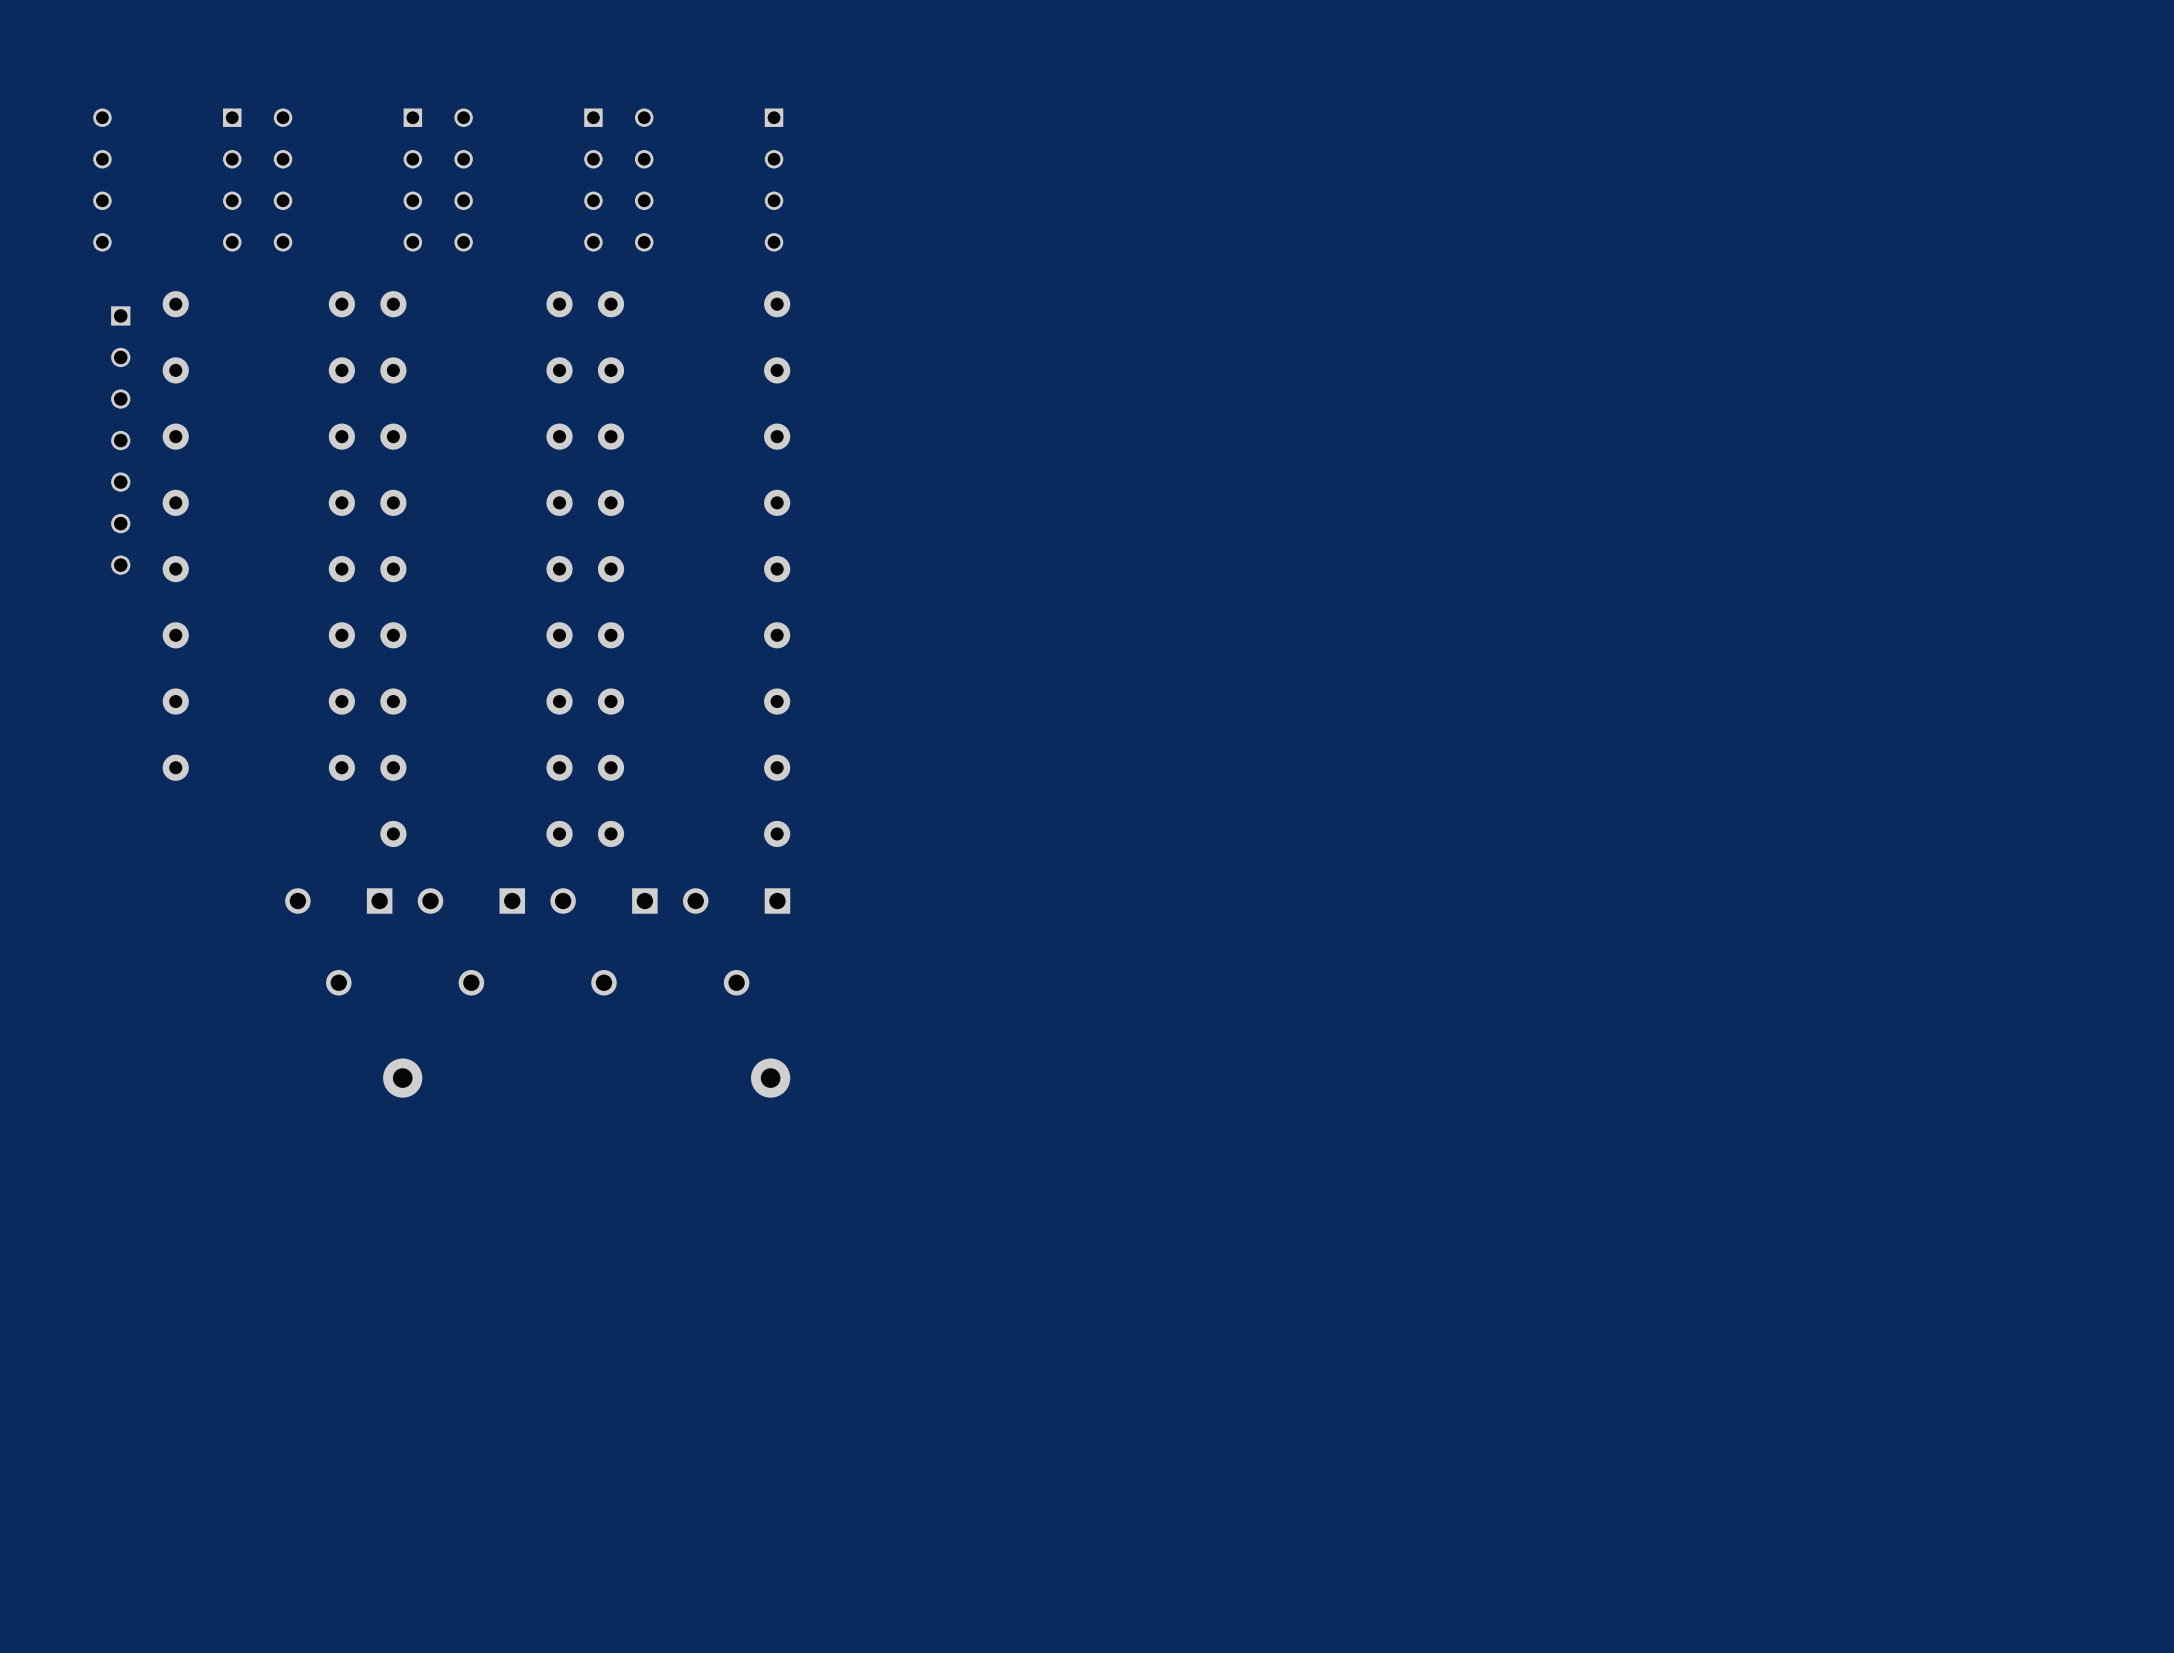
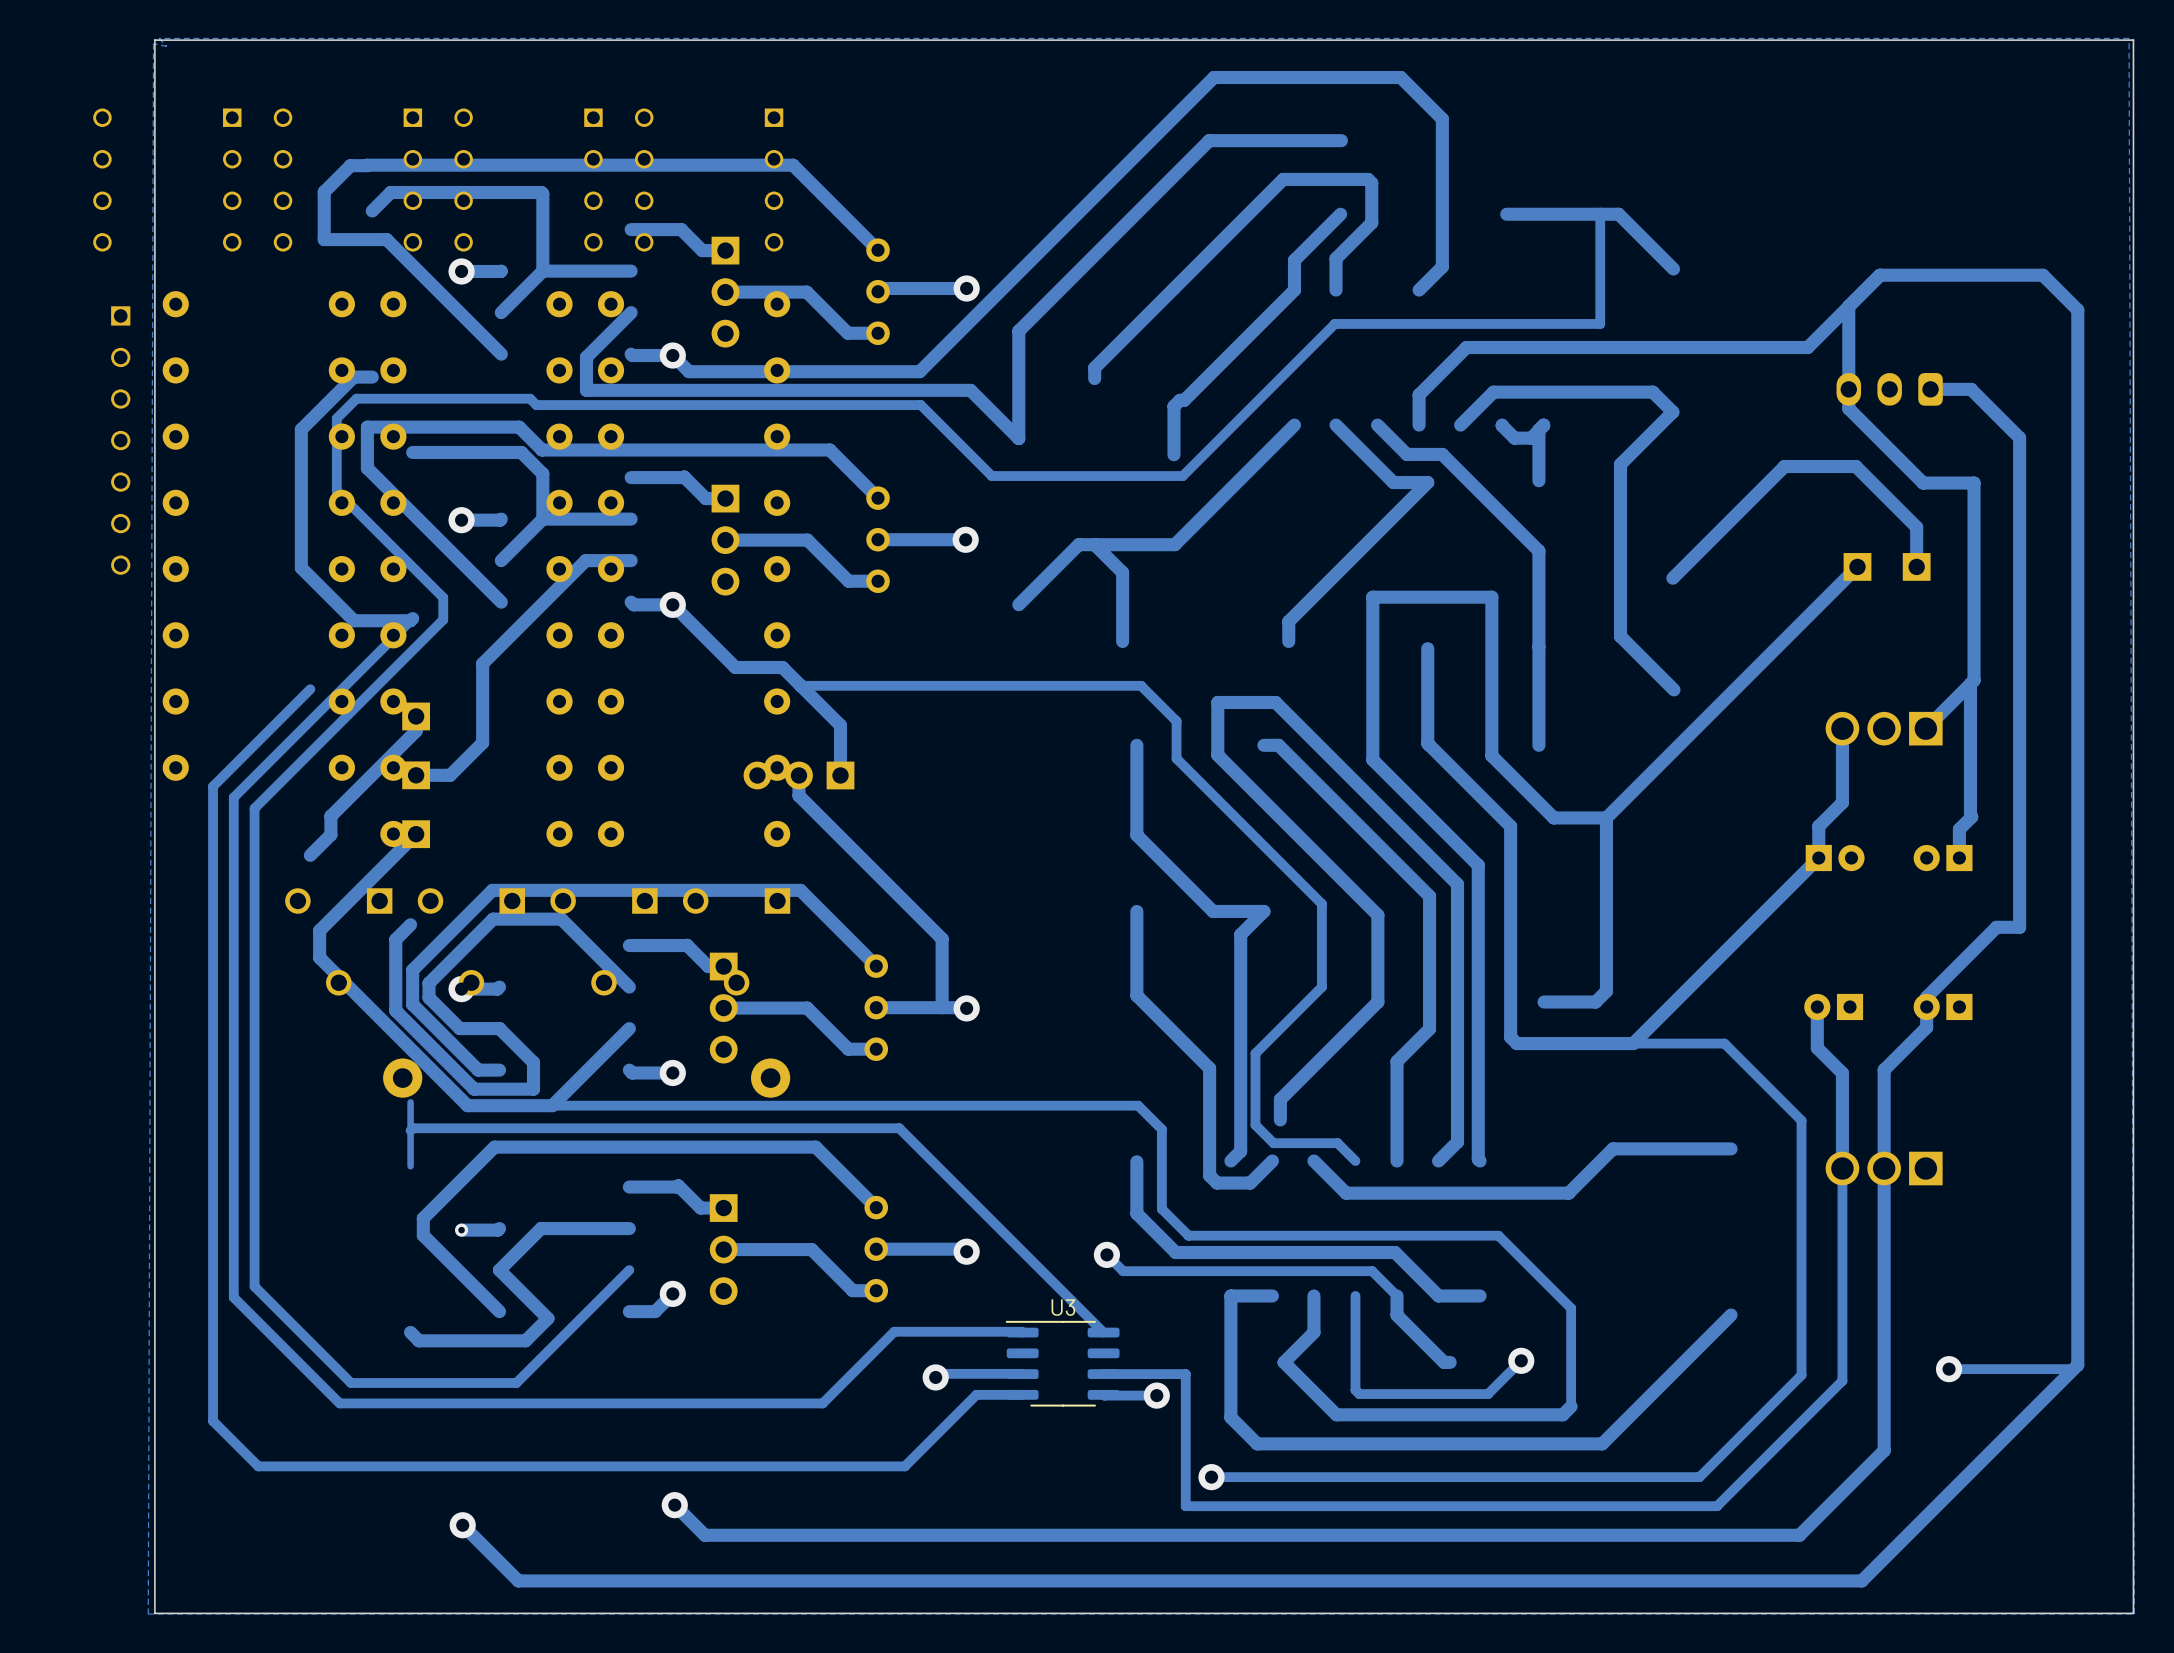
zone outline: none -> (2129, 38) (2134, 1614) (148, 1614) (153, 43) (166, 46) (158, 38) (2129, 38)
board edge: none -> (2133, 40) (154, 40) (154, 1613) (2133, 1613) (2133, 40)
track: none -> (1341, 140) (1209, 140) (1018, 331) (1018, 438) (970, 390) (586, 390) (586, 357) (631, 312)
track: none -> (372, 210) (390, 192) (541, 192) (542, 271)
track: none -> (1340, 214) (1294, 260) (1294, 290) (1184, 400) (1180, 400) (1173, 406) (1173, 454)
track: none -> (1506, 214) (1618, 214) (1673, 269)
track: none -> (1600, 214) (1600, 323) (1334, 323) (1182, 476) (991, 476) (920, 405) (536, 405) (530, 398) (356, 398) (336, 418) (336, 491) (443, 597) (443, 619) (254, 808) (254, 1286) (351, 1383) (516, 1383) (629, 1270)
track: none -> (631, 229) (681, 229) (702, 250) (725, 250)
track: none -> (878, 250) (793, 165) (350, 165) (324, 192) (324, 239) (386, 239) (501, 354)
via: none -> (461, 271)
track: none -> (501, 271) (461, 271)
track: none -> (542, 271) (501, 312)
track: none -> (631, 271) (542, 271)
track: none -> (966, 288) (881, 288) (878, 291)
via: none -> (966, 288)
track: none -> (1336, 290) (1336, 258) (1371, 222) (1371, 183) (1368, 179) (1283, 179) (1094, 367) (1094, 378)
track: none -> (1419, 290) (1442, 266) (1442, 119) (1400, 77) (1213, 77) (919, 371) (689, 371) (672, 355) (631, 354)
part: none -> (878, 291)
track: none -> (725, 292) (806, 292) (847, 333) (878, 333)
part: none -> (725, 292)
track: none -> (1848, 306) (1848, 408) (1923, 483) (1974, 483) (1974, 680) (1925, 728)
via: none -> (672, 355)
track: none -> (372, 377) (353, 377) (301, 429) (301, 567) (354, 620) (410, 620) (412, 618) (233, 797) (233, 1297) (339, 1403) (822, 1403) (894, 1331) (1022, 1332)
part: none -> (1889, 389)
track: none -> (1930, 389) (1971, 389) (2019, 437) (2019, 927) (1996, 927) (1926, 997) (1926, 1027) (1884, 1070) (1884, 1450) (1799, 1535) (704, 1535) (674, 1505)
track: none -> (1294, 425) (1174, 544) (1078, 544) (1018, 604)
track: none -> (1336, 425) (1393, 482) (1427, 482) (1288, 621) (1288, 641)
track: none -> (1377, 425) (1406, 454) (1442, 454) (1538, 551) (1538, 745)
track: none -> (1419, 425) (1419, 394) (1466, 347) (1807, 347) (1880, 275) (2042, 275) (2077, 310) (2077, 1364)
track: none -> (1460, 425) (1493, 392) (1652, 392) (1672, 412) (1620, 464) (1620, 636) (1673, 689)
track: none -> (1502, 425) (1514, 438) (1531, 438) (1543, 425) (1543, 425) (1538, 429) (1538, 480)
track: none -> (412, 452) (521, 452) (542, 473) (542, 519)
track: none -> (631, 477) (684, 477) (705, 498) (725, 498)
track: none -> (878, 498) (829, 450) (542, 450) (519, 427) (367, 427) (367, 468) (501, 602)
track: none -> (501, 519) (461, 520)
track: none -> (542, 519) (501, 560)
track: none -> (631, 519) (542, 519)
via: none -> (461, 520)
part: none -> (878, 539)
track: none -> (965, 539) (878, 539)
via: none -> (965, 539)
track: none -> (725, 540) (807, 540) (848, 581) (878, 581)
part: none -> (725, 540)
track: none -> (1094, 544) (1122, 572) (1122, 641)
track: none -> (631, 560) (585, 560) (482, 663) (482, 742) (450, 775) (416, 775)
track: none -> (1857, 566) (1606, 817)
part: none -> (1857, 566)
track: none -> (1916, 566) (1916, 527) (1855, 466) (1784, 466) (1672, 578)
part: none -> (1916, 566)
track: none -> (631, 602) (633, 604) (672, 604) (735, 667) (782, 667) (840, 725) (840, 775)
via: none -> (672, 604)
track: none -> (1427, 648) (1427, 743) (1510, 826) (1510, 1037) (1516, 1043) (1633, 1043)
track: none -> (1970, 684) (1971, 816) (1959, 829) (1959, 858)
track: none -> (800, 685) (1141, 685) (1176, 721) (1176, 758) (1321, 903) (1321, 987) (1255, 1053) (1255, 1125) (1273, 1143) (1337, 1143) (1355, 1161)
track: none -> (310, 689) (213, 786) (213, 1421) (258, 1466) (904, 1466) (976, 1394) (1022, 1394)
track: none -> (416, 716) (416, 731) (330, 816) (330, 834) (310, 855)
part: none -> (416, 716)
track: none -> (1842, 728) (1842, 802) (1818, 826) (1818, 858) (1633, 1043)
part: none -> (1884, 728)
track: none -> (1136, 745) (1136, 835) (1213, 911) (1263, 911) (1240, 934) (1240, 1151) (1230, 1161)
track: none -> (1263, 745) (1278, 745) (1429, 896) (1429, 1028) (1397, 1061) (1397, 1161)
part: none -> (416, 775)
track: none -> (798, 775) (798, 795) (942, 938) (942, 1007)
part: none -> (798, 775)
track: none -> (1606, 817) (1553, 817) (1491, 755) (1491, 597) (1372, 597) (1372, 759) (1478, 865) (1478, 1159) (1480, 1161)
track: none -> (1606, 817) (1606, 991) (1595, 1002) (1544, 1002)
track: none -> (416, 834) (319, 930) (319, 957) (467, 1105) (552, 1105)
part: none -> (416, 834)
part: none -> (1835, 858)
part: none -> (1943, 858)
track: none -> (1136, 911) (1136, 995) (1209, 1068) (1209, 1175) (1216, 1183) (1250, 1183) (1272, 1161)
track: none -> (410, 924) (395, 939) (395, 1010) (474, 1089) (533, 1089) (533, 1062) (499, 1028) (459, 1028) (429, 997) (429, 983) (493, 919) (561, 919) (629, 987)
track: none -> (629, 945) (687, 945) (708, 966) (723, 966)
track: none -> (876, 966) (800, 890) (492, 890) (412, 970) (412, 1004) (478, 1070) (499, 1070)
track: none -> (499, 987) (497, 989) (461, 989)
via: none -> (461, 989)
track: none -> (1817, 1006) (1817, 1048) (1842, 1073) (1842, 1380) (1717, 1506) (1185, 1506) (1185, 1374) (1103, 1374)
part: none -> (1833, 1006)
part: none -> (1943, 1006)
track: none -> (876, 1007) (966, 1008)
part: none -> (876, 1007)
track: none -> (723, 1008) (807, 1008) (848, 1049) (876, 1049)
part: none -> (723, 1008)
via: none -> (966, 1008)
track: none -> (629, 1028) (552, 1105)
track: none -> (1633, 1043) (1724, 1043) (1801, 1120) (1801, 1375) (1699, 1477) (1211, 1477)
track: none -> (629, 1070) (632, 1072) (672, 1072)
via: none -> (672, 1072)
track: none -> (410, 1102) (410, 1166)
track: none -> (552, 1105) (1138, 1105) (1161, 1129) (1161, 1209) (1188, 1235) (1498, 1235) (1571, 1308) (1571, 1406) (1562, 1414) (1336, 1414) (1284, 1362) (1313, 1332) (1313, 1295)
track: none -> (1280, 1119) (1280, 1099) (1377, 1002) (1377, 915) (1217, 755) (1217, 702) (1275, 702) (1457, 884) (1457, 1142) (1438, 1161)
track: none -> (410, 1130) (412, 1128) (899, 1128) (1103, 1332)
track: none -> (1731, 1148) (1613, 1148) (1568, 1193) (1346, 1193) (1313, 1161)
track: none -> (1136, 1161) (1136, 1213) (1175, 1252) (1395, 1252) (1438, 1295) (1480, 1295)
part: none -> (1884, 1168)
track: none -> (629, 1187) (678, 1185) (700, 1208) (723, 1208)
track: none -> (876, 1207) (815, 1147) (494, 1147) (423, 1218) (423, 1235) (499, 1311)
track: none -> (499, 1228) (461, 1230)
track: none -> (629, 1228) (541, 1228) (499, 1270) (547, 1318) (525, 1340) (419, 1340) (410, 1332)
via: none -> (461, 1230)
track: none -> (723, 1249) (811, 1249) (852, 1290) (876, 1290)
part: none -> (723, 1249)
track: none -> (876, 1249) (964, 1249) (966, 1251)
part: none -> (876, 1249)
via: none -> (966, 1251)
track: none -> (1106, 1254) (1123, 1271) (1372, 1271) (1397, 1295) (1397, 1315) (1444, 1362) (1450, 1362)
via: none -> (1106, 1254)
track: none -> (672, 1293) (655, 1311) (629, 1311)
via: none -> (672, 1293)
track: none -> (1272, 1295) (1230, 1295) (1230, 1417) (1257, 1443) (1602, 1443) (1731, 1315)
track: none -> (1355, 1295) (1355, 1390) (1359, 1394) (1488, 1394) (1521, 1360)
via: none -> (1521, 1360)
U3: none -> (1062, 1363)
track: none -> (2077, 1364) (1861, 1580) (518, 1580) (462, 1525)
track: none -> (2077, 1364) (2073, 1369) (1949, 1369)
via: none -> (1949, 1369)
track: none -> (1022, 1374) (939, 1373) (935, 1377)
via: none -> (935, 1377)
track: none -> (1103, 1394) (1156, 1395)
via: none -> (1156, 1395)
via: none -> (1211, 1477)
via: none -> (674, 1505)
via: none -> (462, 1525)

